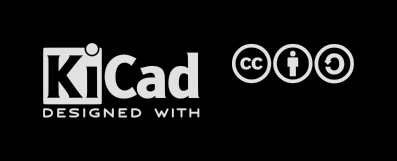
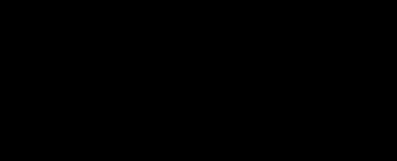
drawing: [43, 43, 200, 118] -> none
drawing: [231, 43, 354, 84] -> none

